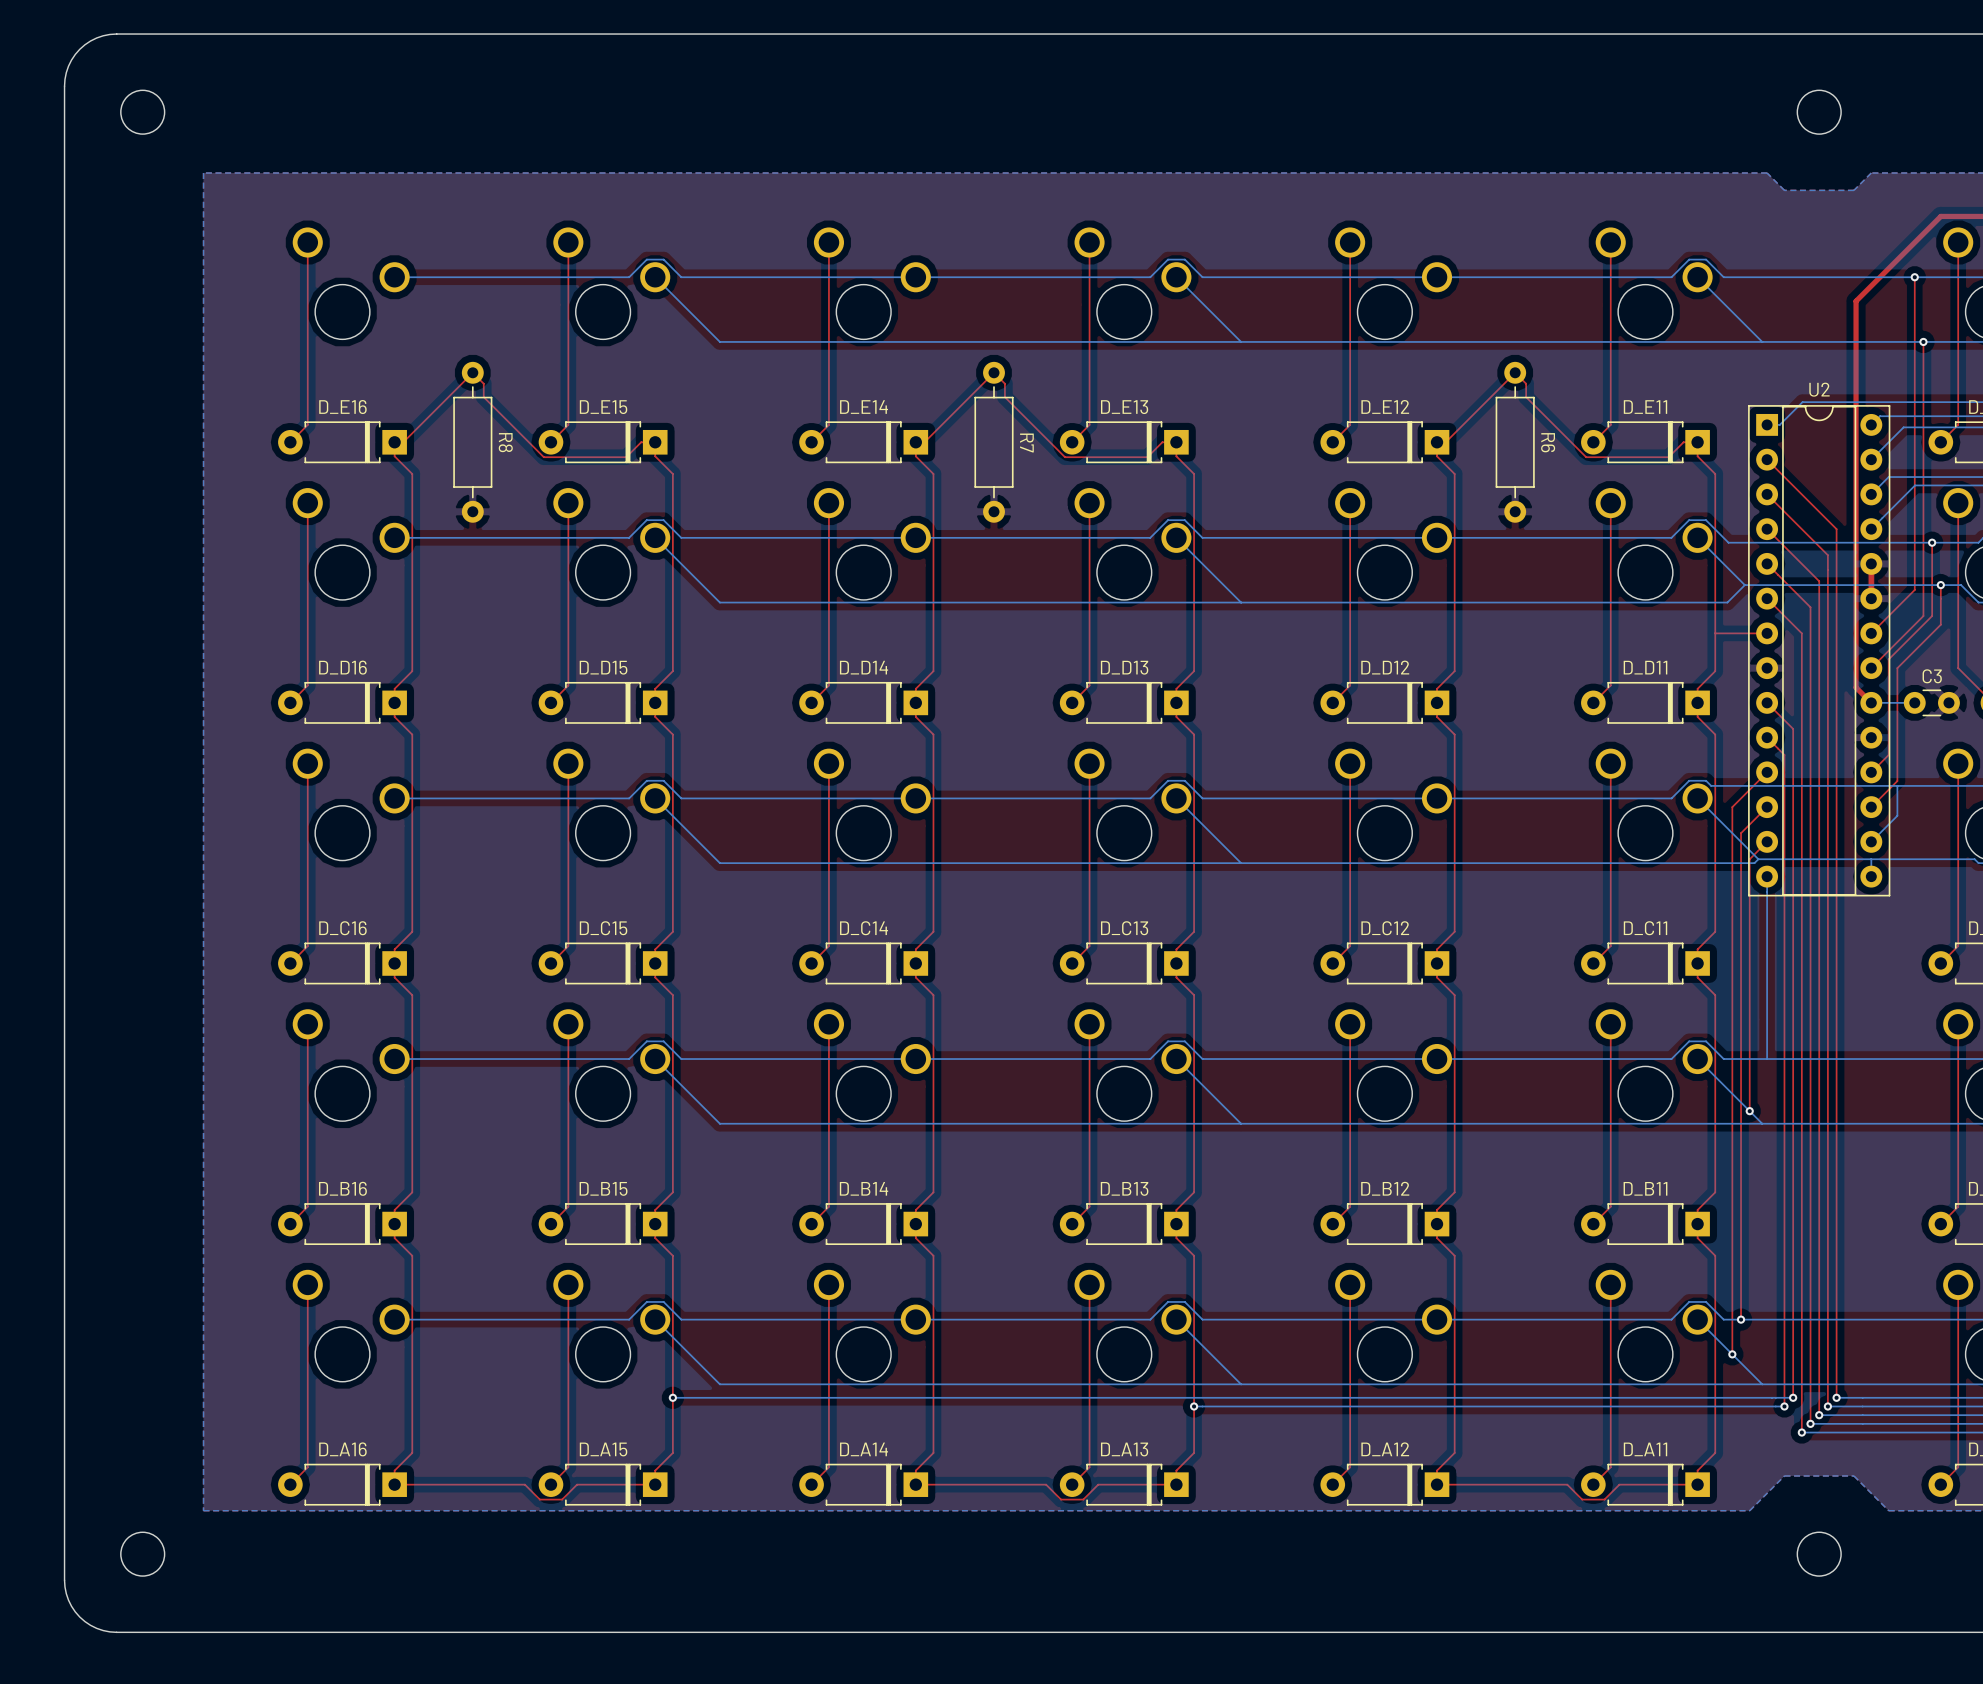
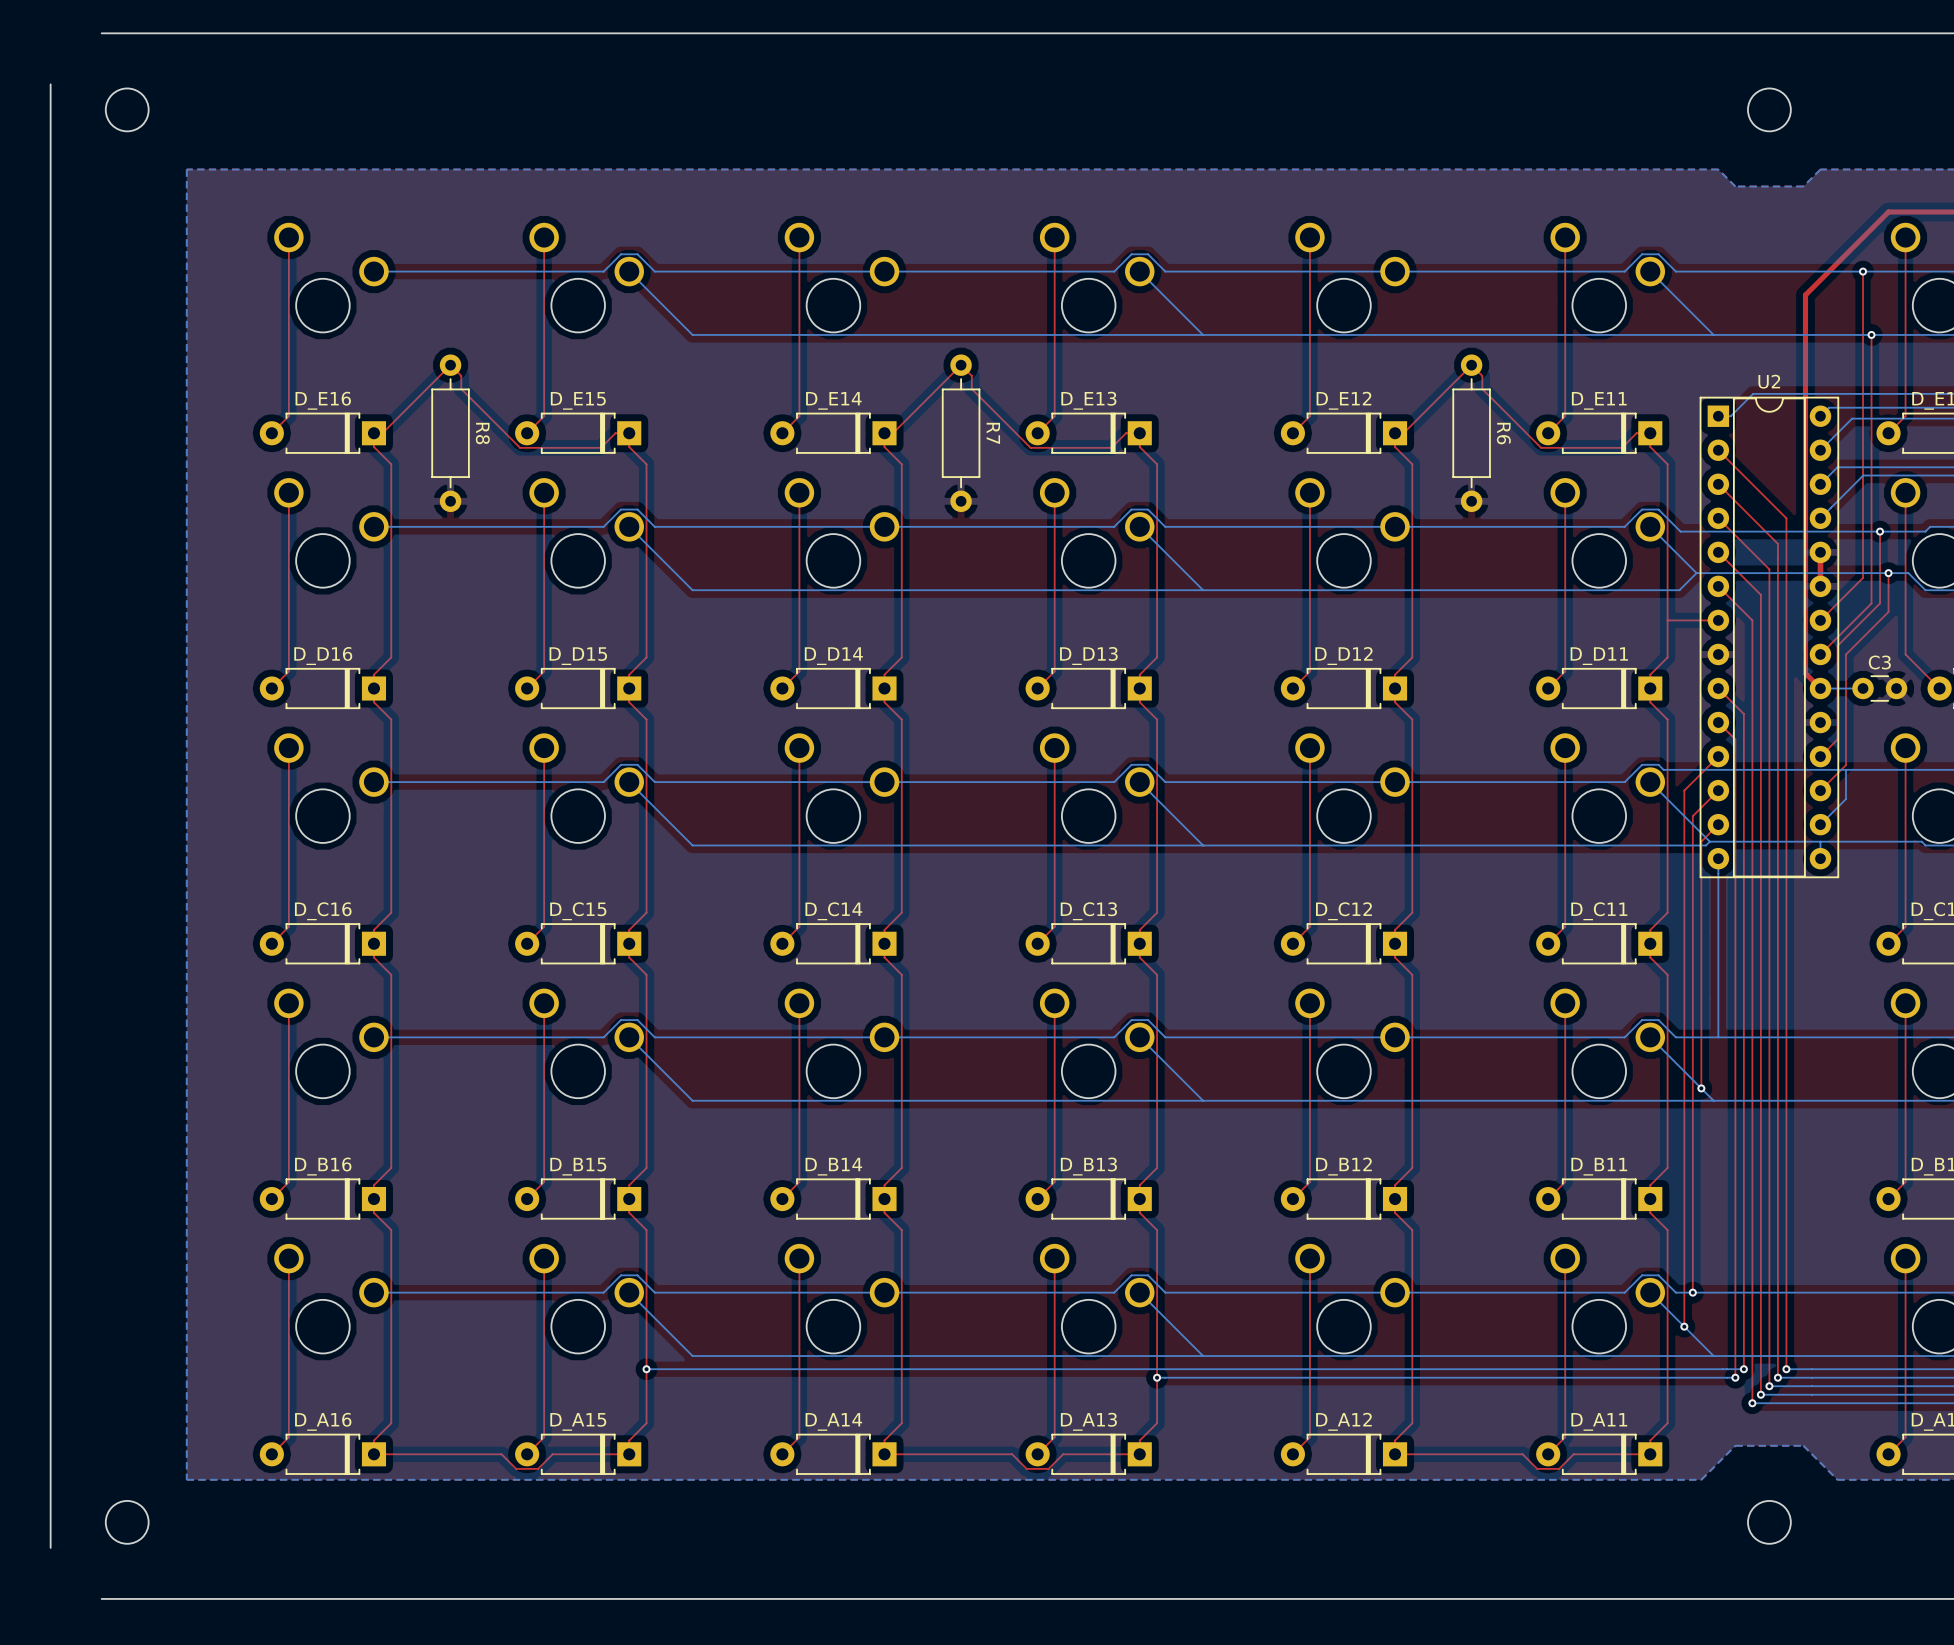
board edge: (116, 34) (96, 37) (79, 49) (68, 66) (64, 86) -> none
board edge: (64, 1580) (68, 1600) (79, 1617) (96, 1628) (116, 1632) -> none

